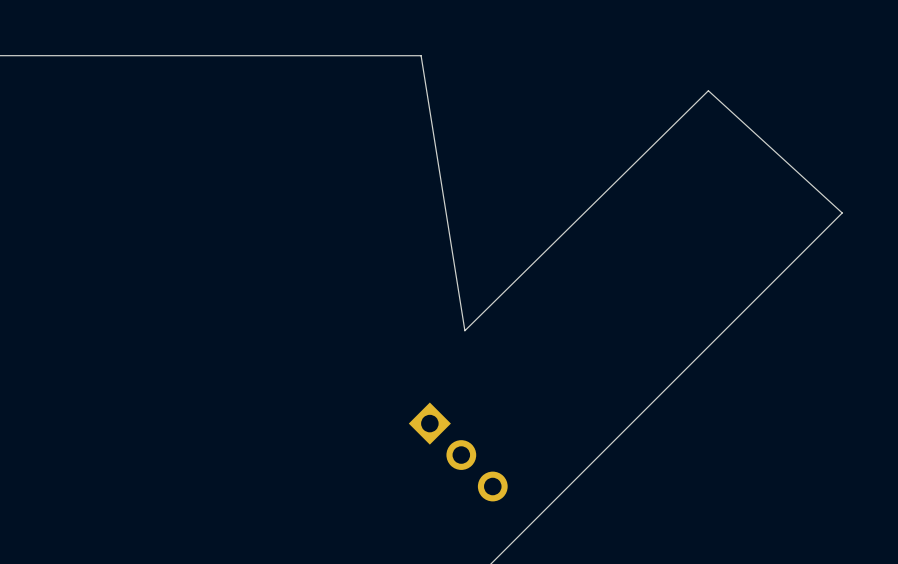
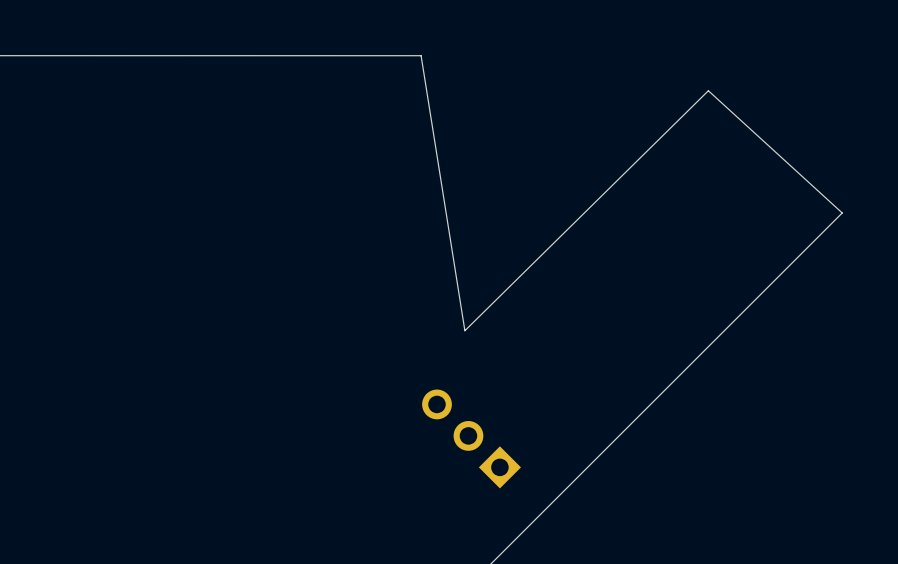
part rotation: 0° (458, 451) -> 180° (471, 438)

